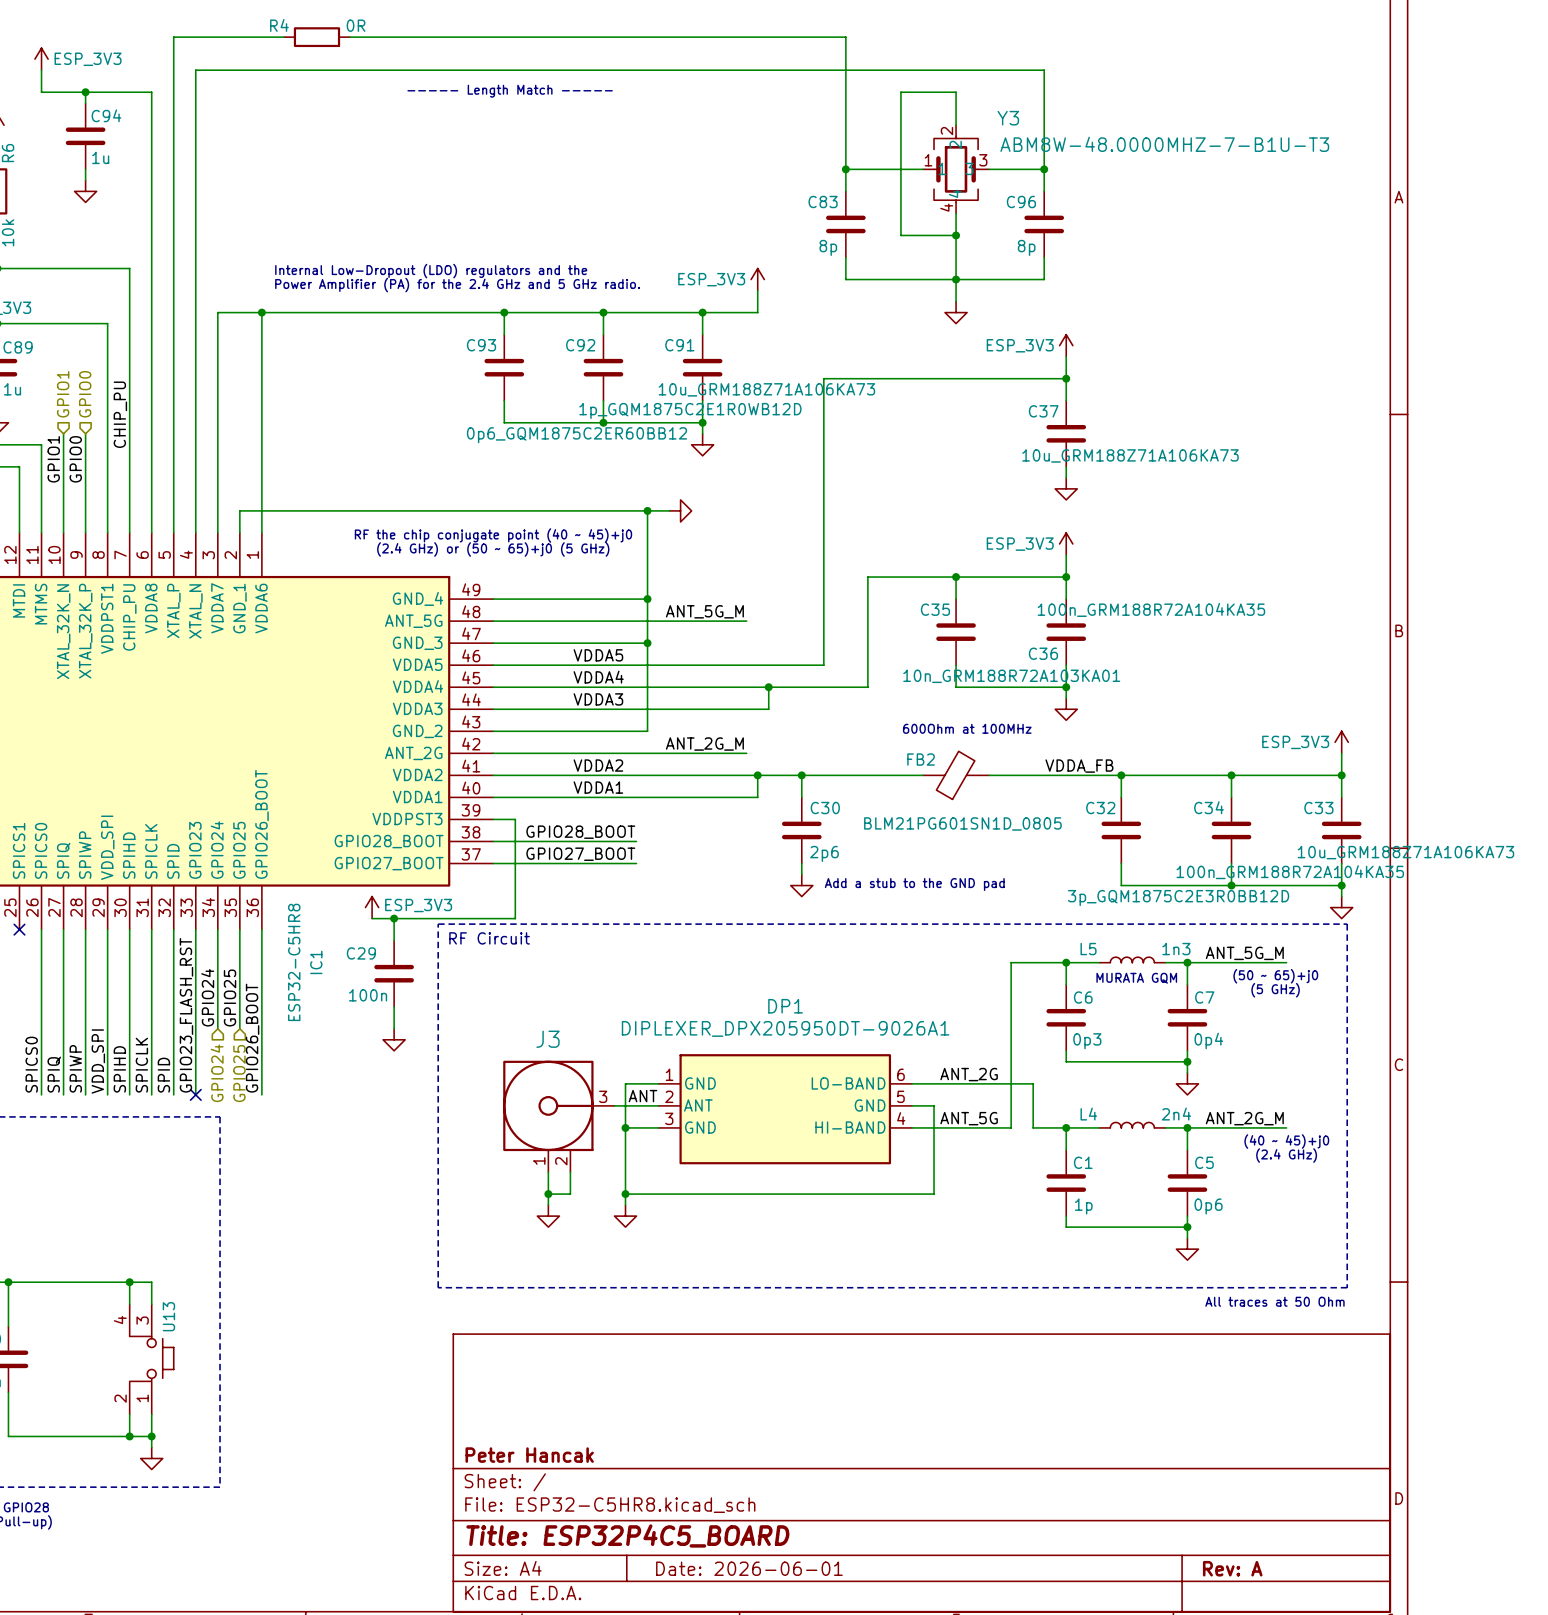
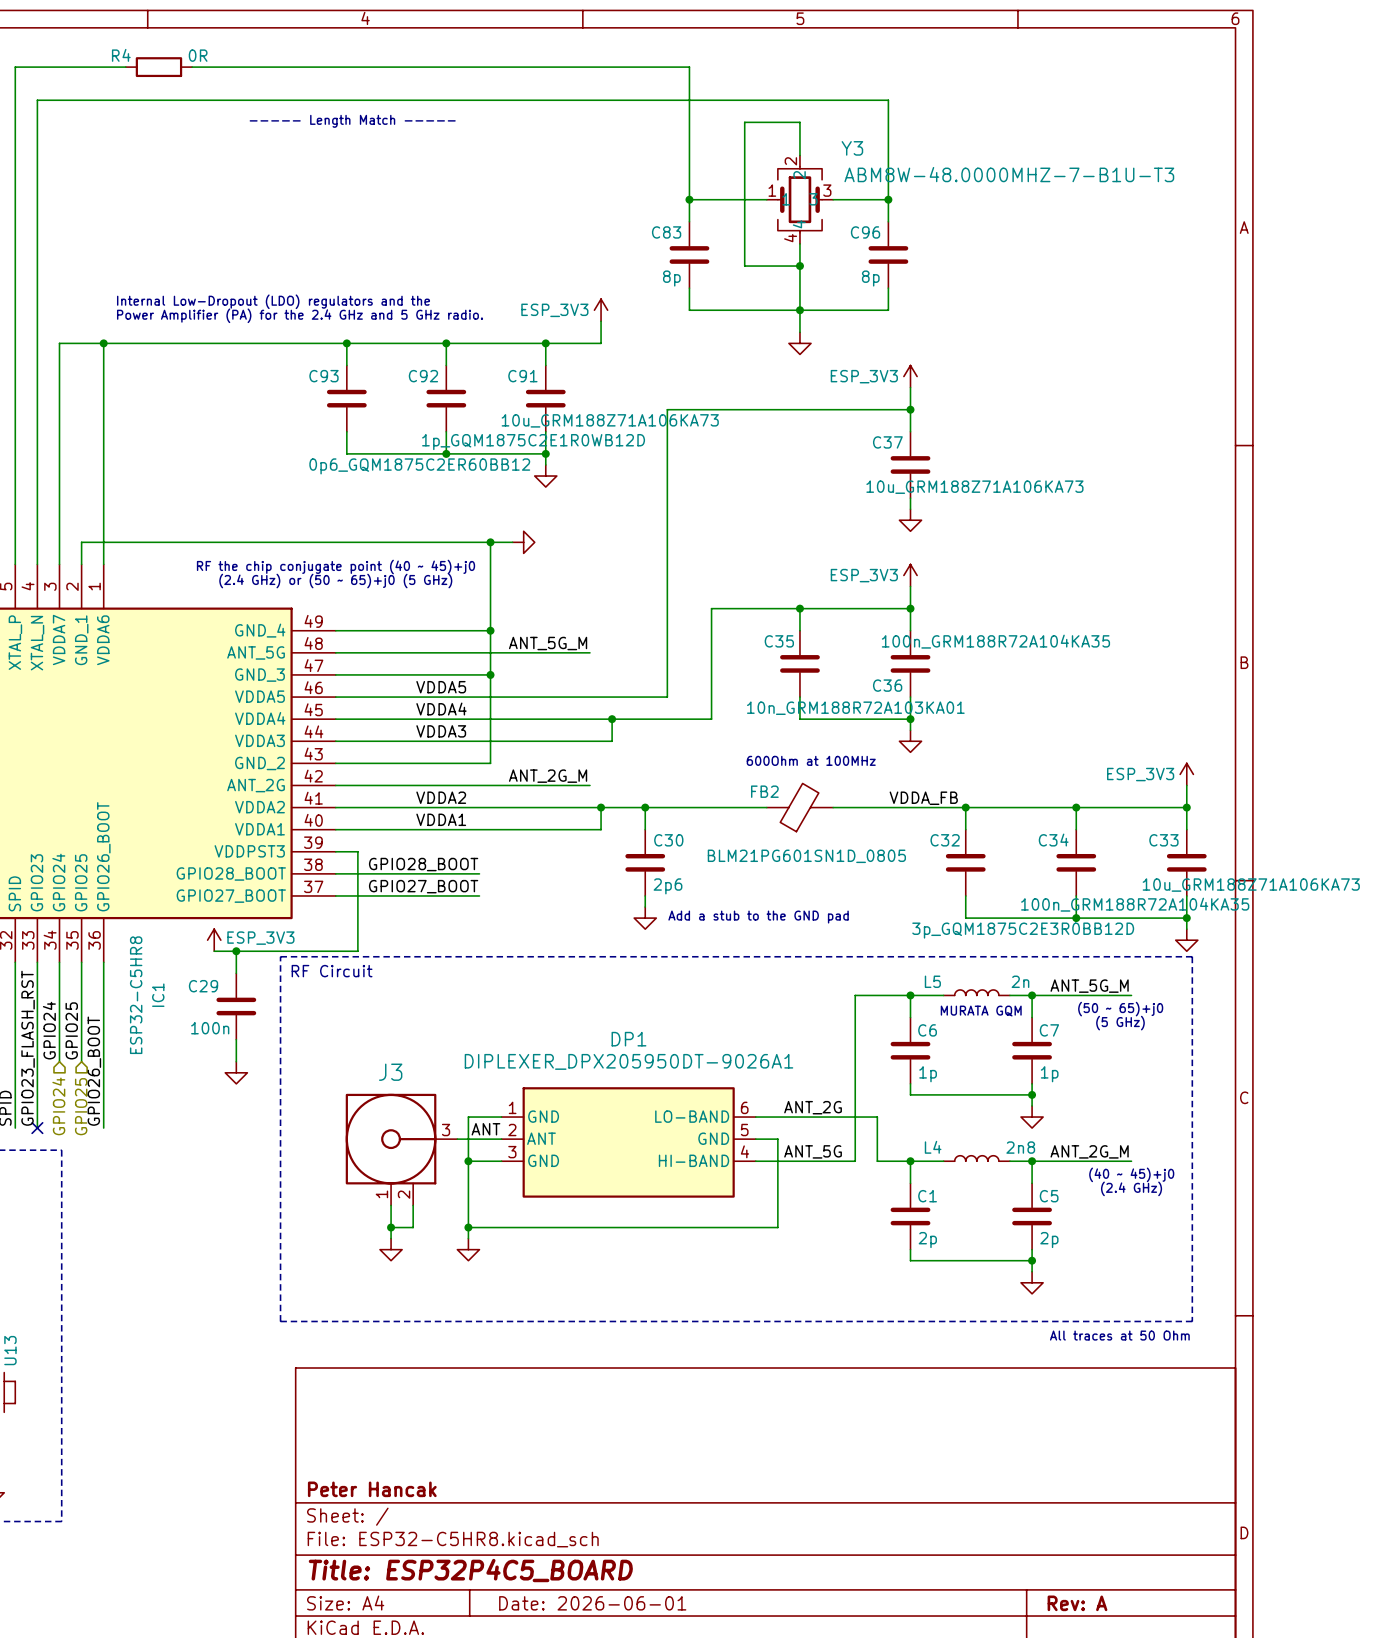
L5 value: 1n3 (1176, 949) -> 2n (1020, 981)
C7 value: 0p4 (1208, 1040) -> 1p (1049, 1074)
C6 value: 0p3 (1087, 1041) -> 1p (928, 1074)
L4 value: 2n4 (1176, 1114) -> 2n8 (1020, 1147)
C1 value: 1p (1083, 1206) -> 2p (927, 1240)
C5 value: 0p6 (1208, 1206) -> 2p (1049, 1240)

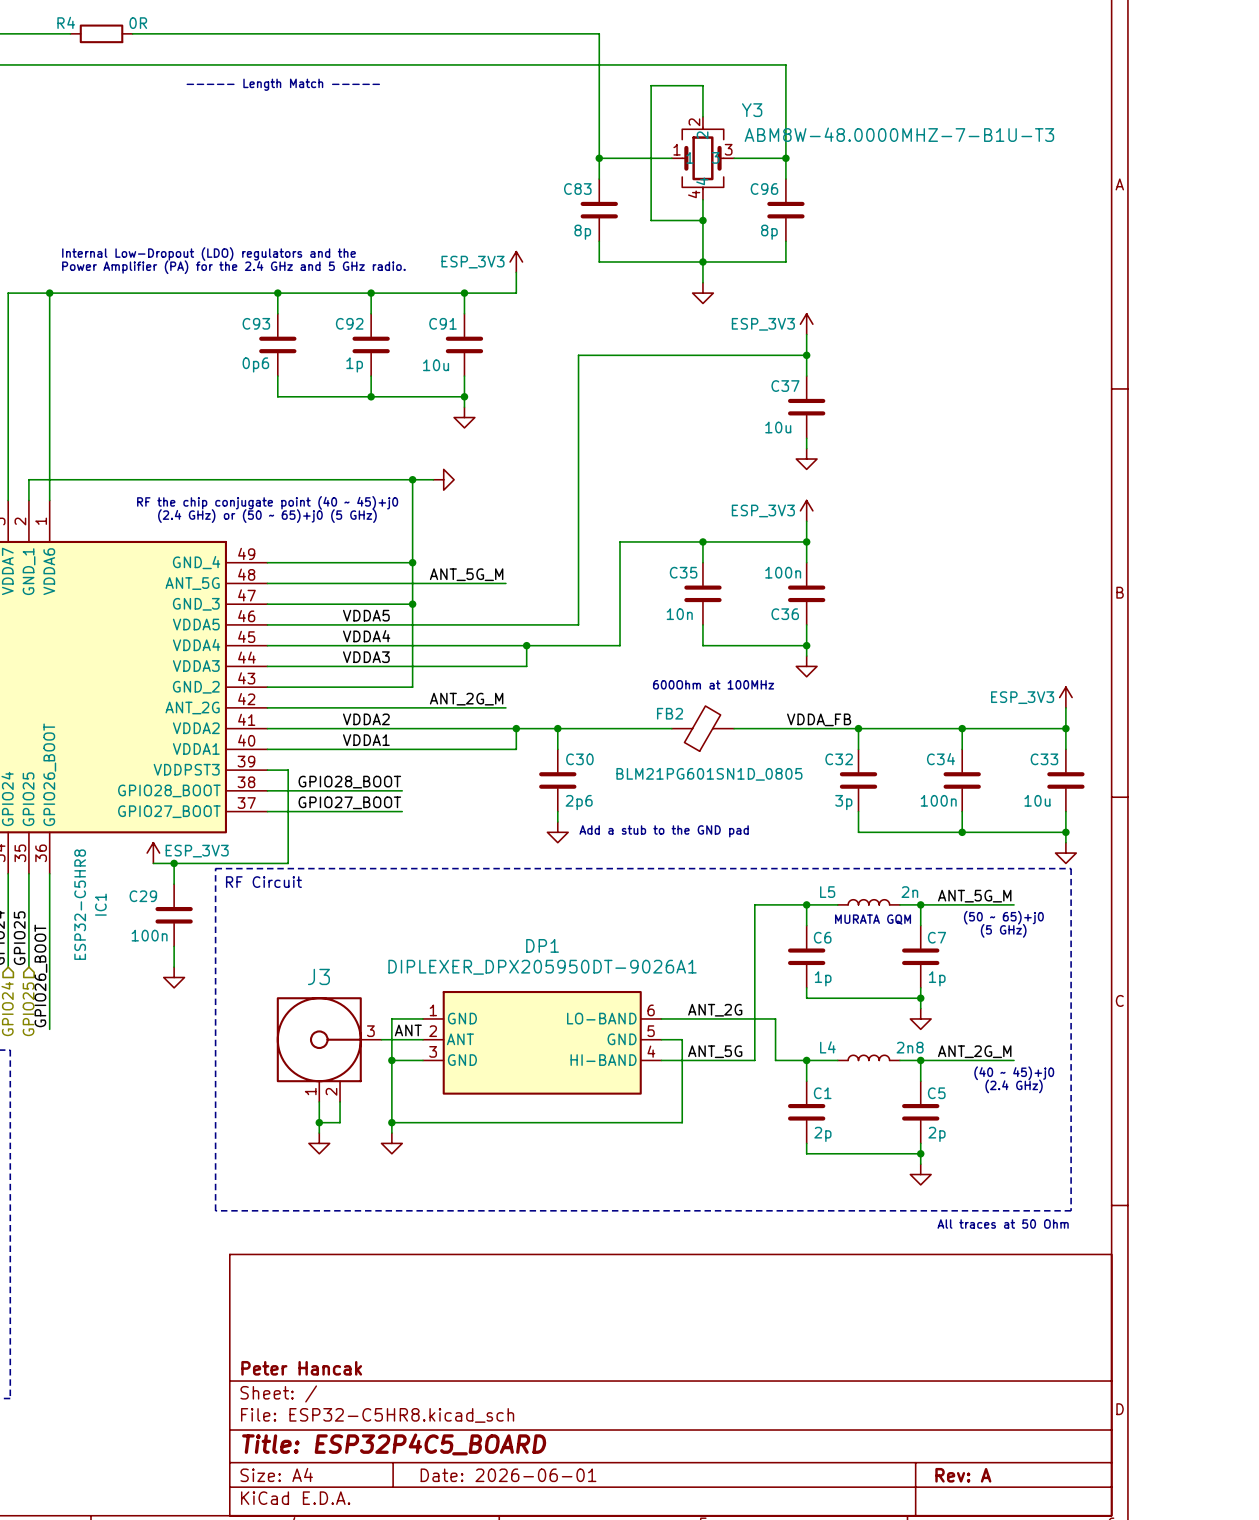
C91 value: 10u_GRM188Z71A106KA73 (610, 420) -> 10u (436, 365)
C92 value: 1p_GQM1875C2E1R0WB12D (533, 442) -> 1p (354, 364)
C93 value: 0p6_GQM1875C2ER60BB12 (419, 466) -> 0p6 (255, 364)
C37 value: 10u_GRM188Z71A106KA73 (974, 487) -> 10u (778, 427)
C36 value: 100n_GRM188R72A104KA35 (995, 641) -> 100n (783, 572)
C35 value: 10n_GRM188R72A103KA01 (855, 708) -> 10n (679, 614)
C33 value: 10u_GRM188Z71A106KA73 (1251, 885) -> 10u (1037, 800)
C34 value: 100n_GRM188R72A104KA35 (1135, 904) -> 100n (938, 800)
C32 value: 3p_GQM1875C2E3R0BB12D (1023, 930) -> 3p (843, 802)

